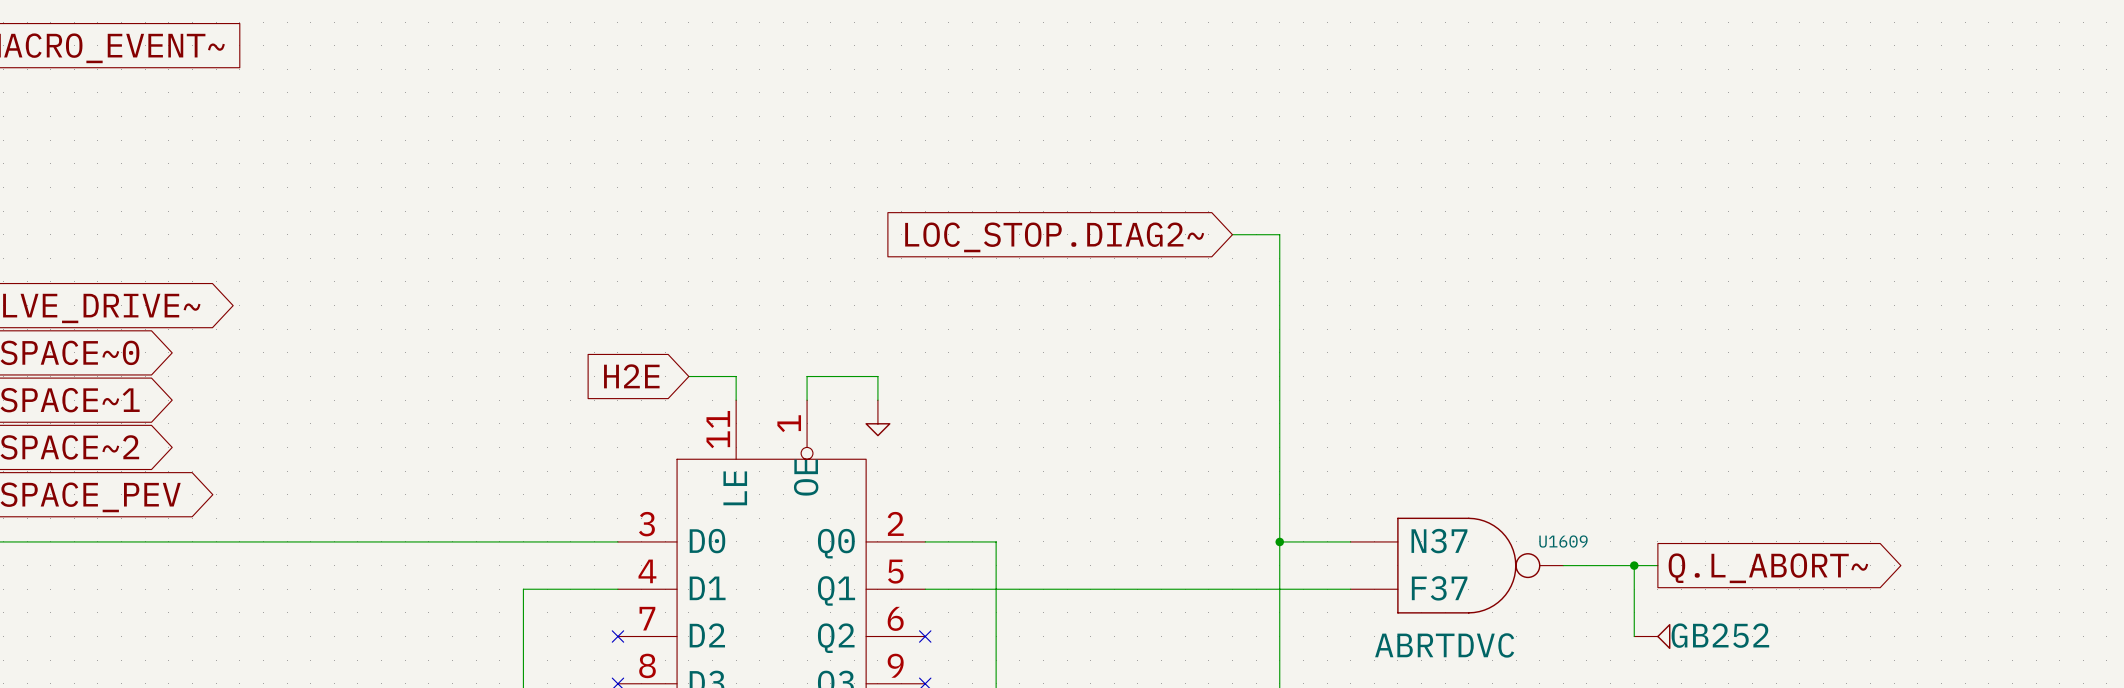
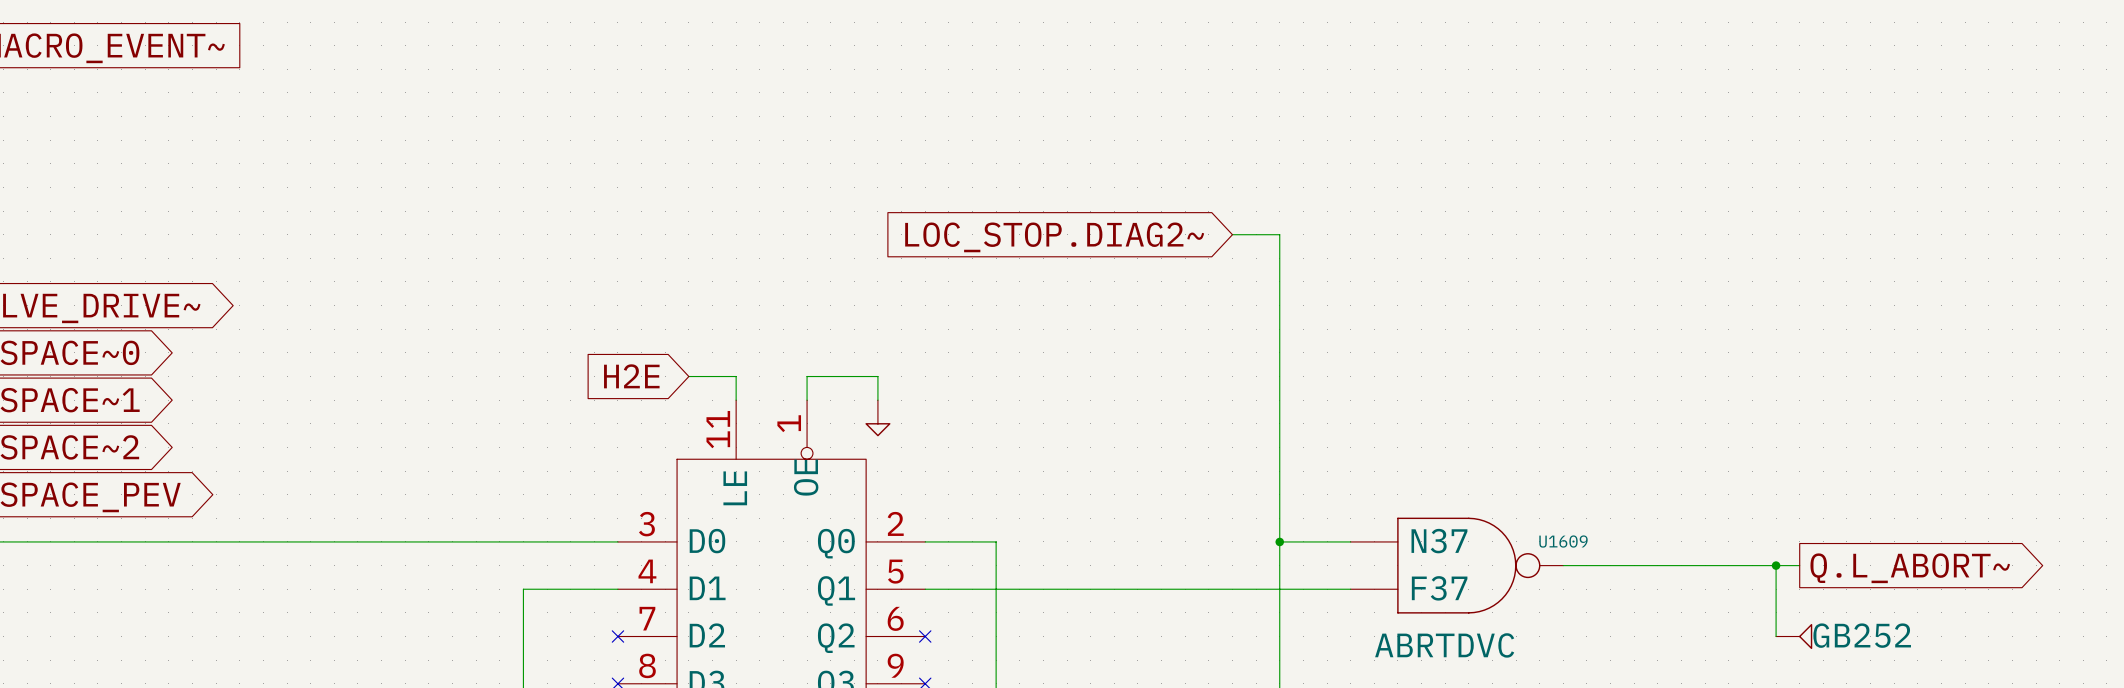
wire: (1634, 565) (1634, 636) -> (1776, 565) (1776, 636)
junction: (1634, 565) -> none
wire: none -> (1657, 565) (1799, 565)
junction: none -> (1776, 565)
global label position: Q.L_ABORT~ (1768, 568) -> Q.L_ABORT~ (1910, 568)
GB252 position: (1652, 636) -> (1794, 636)

